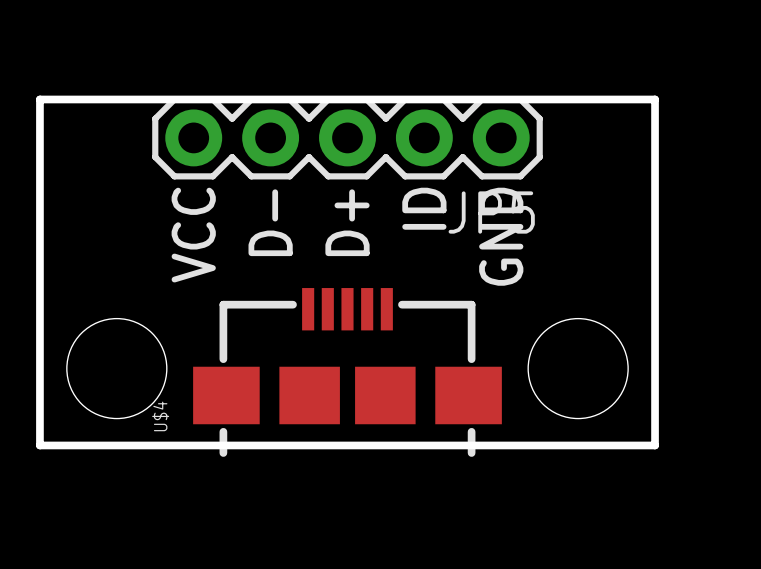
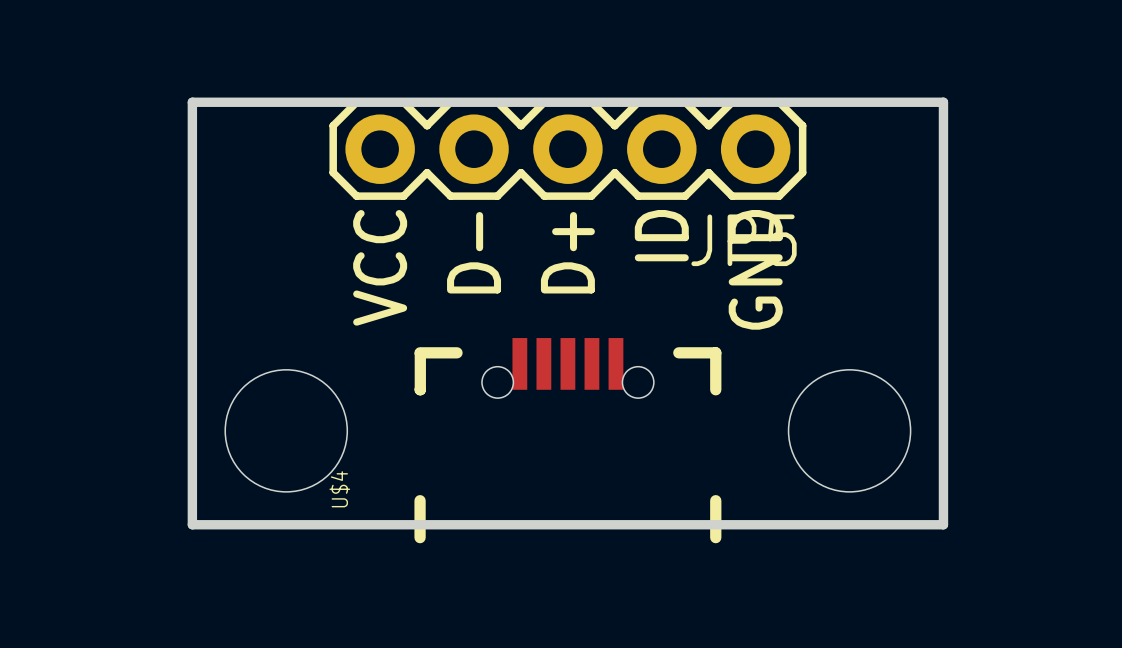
U$4 footprint: [193, 288, 502, 457] -> [414, 338, 722, 544]

